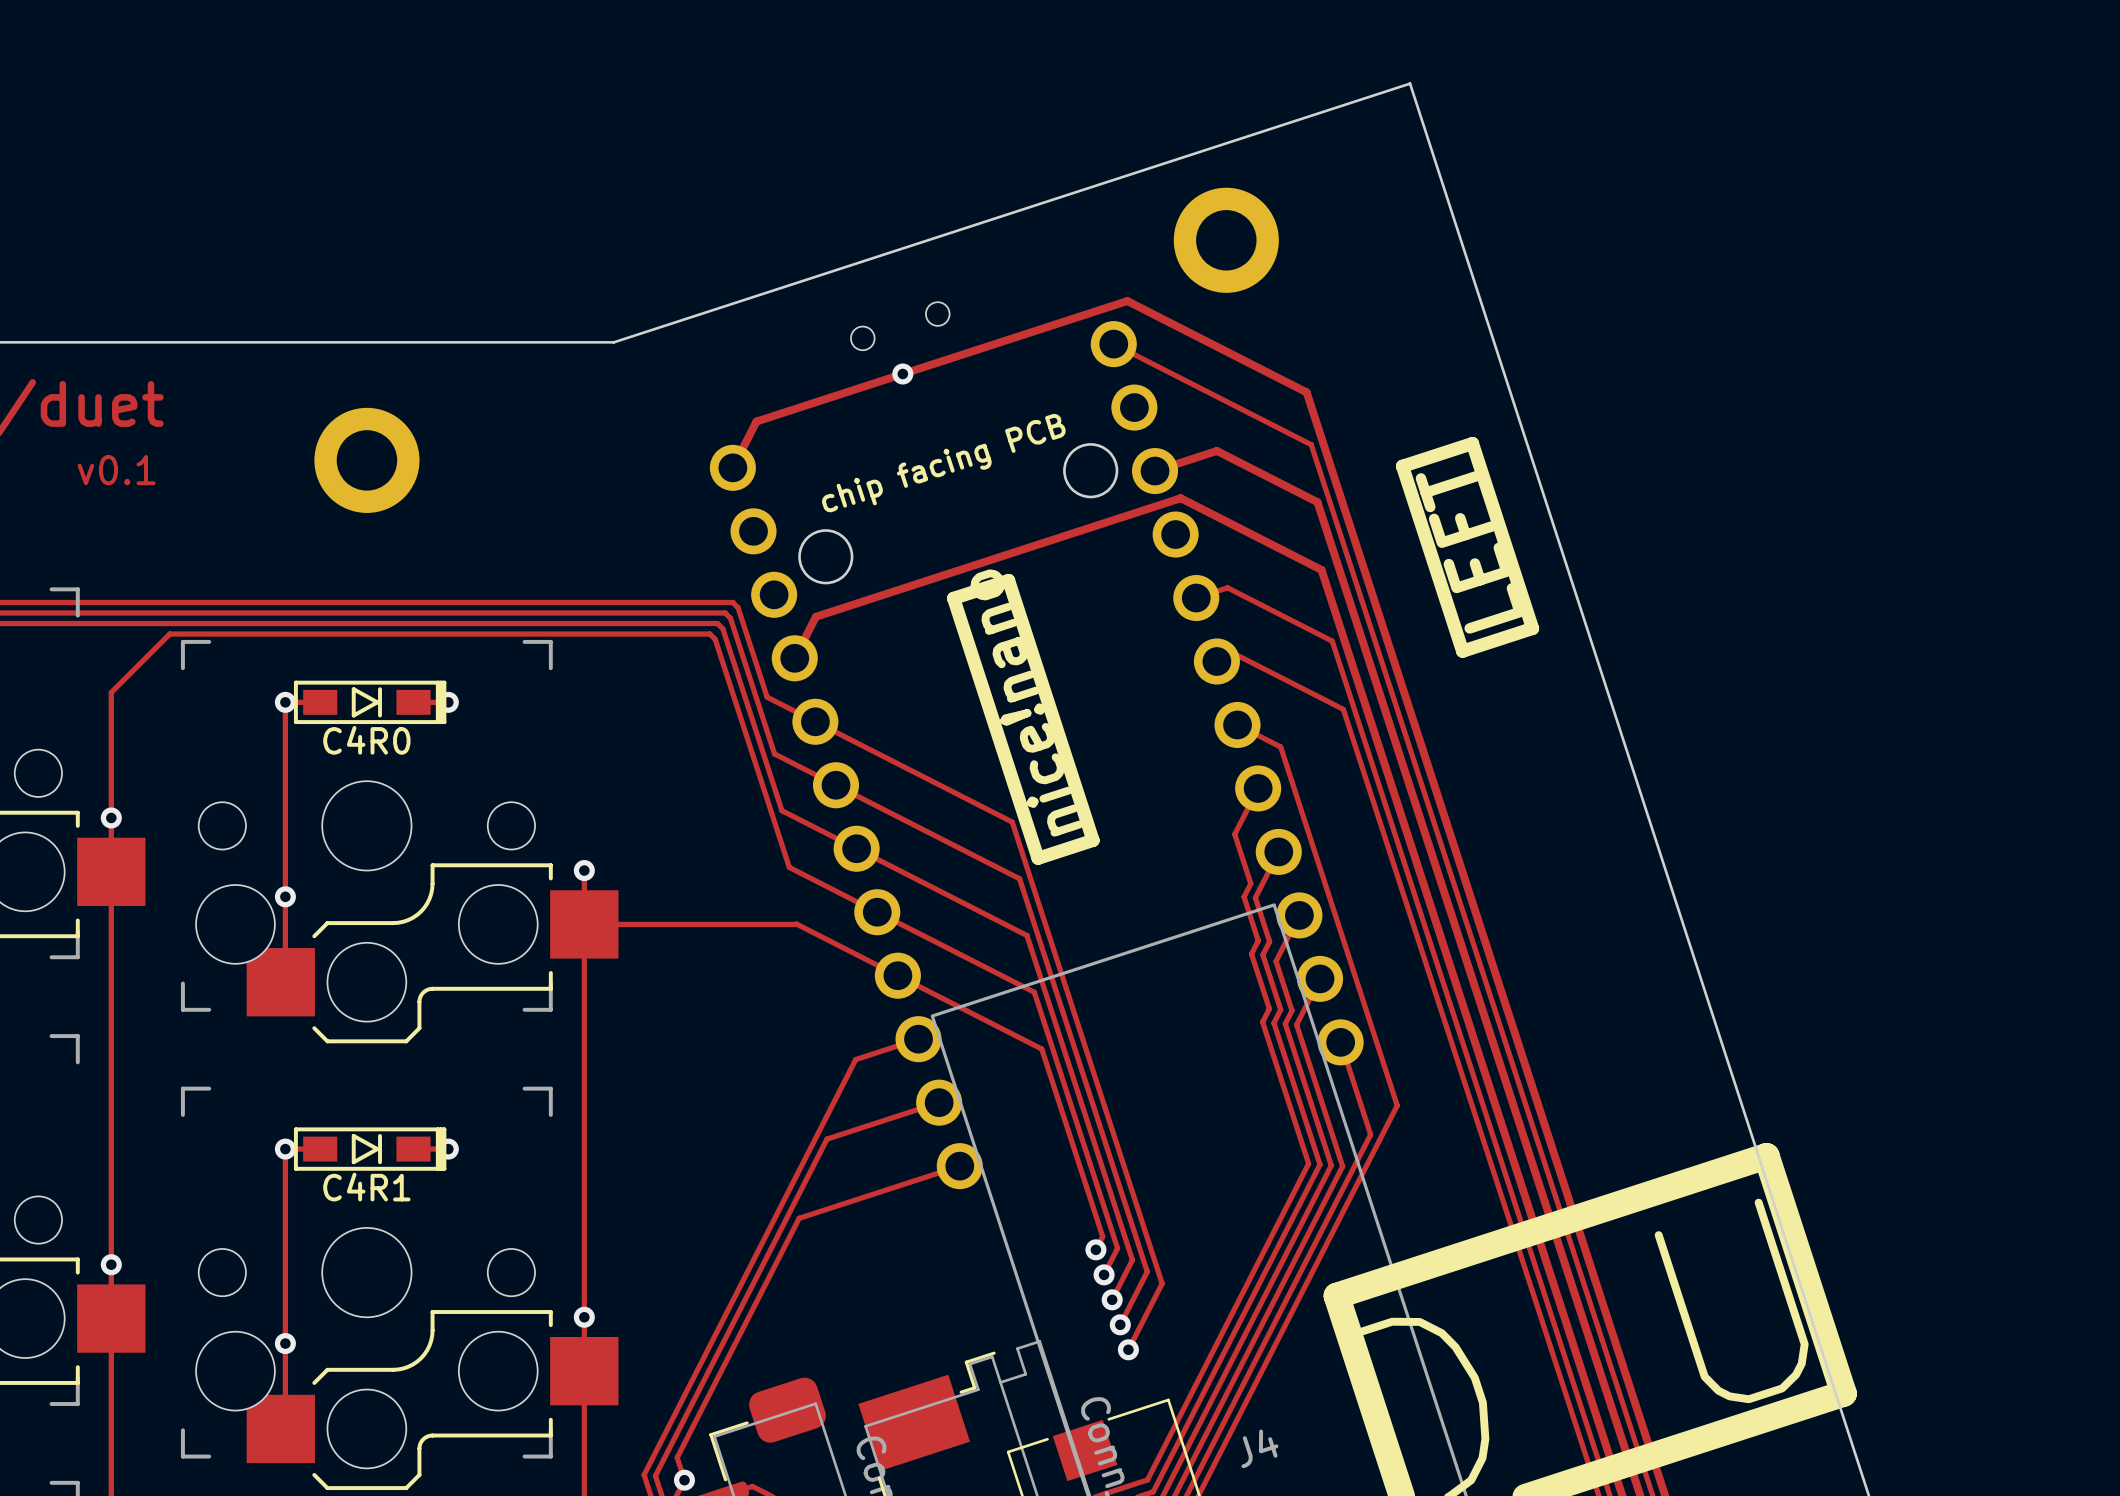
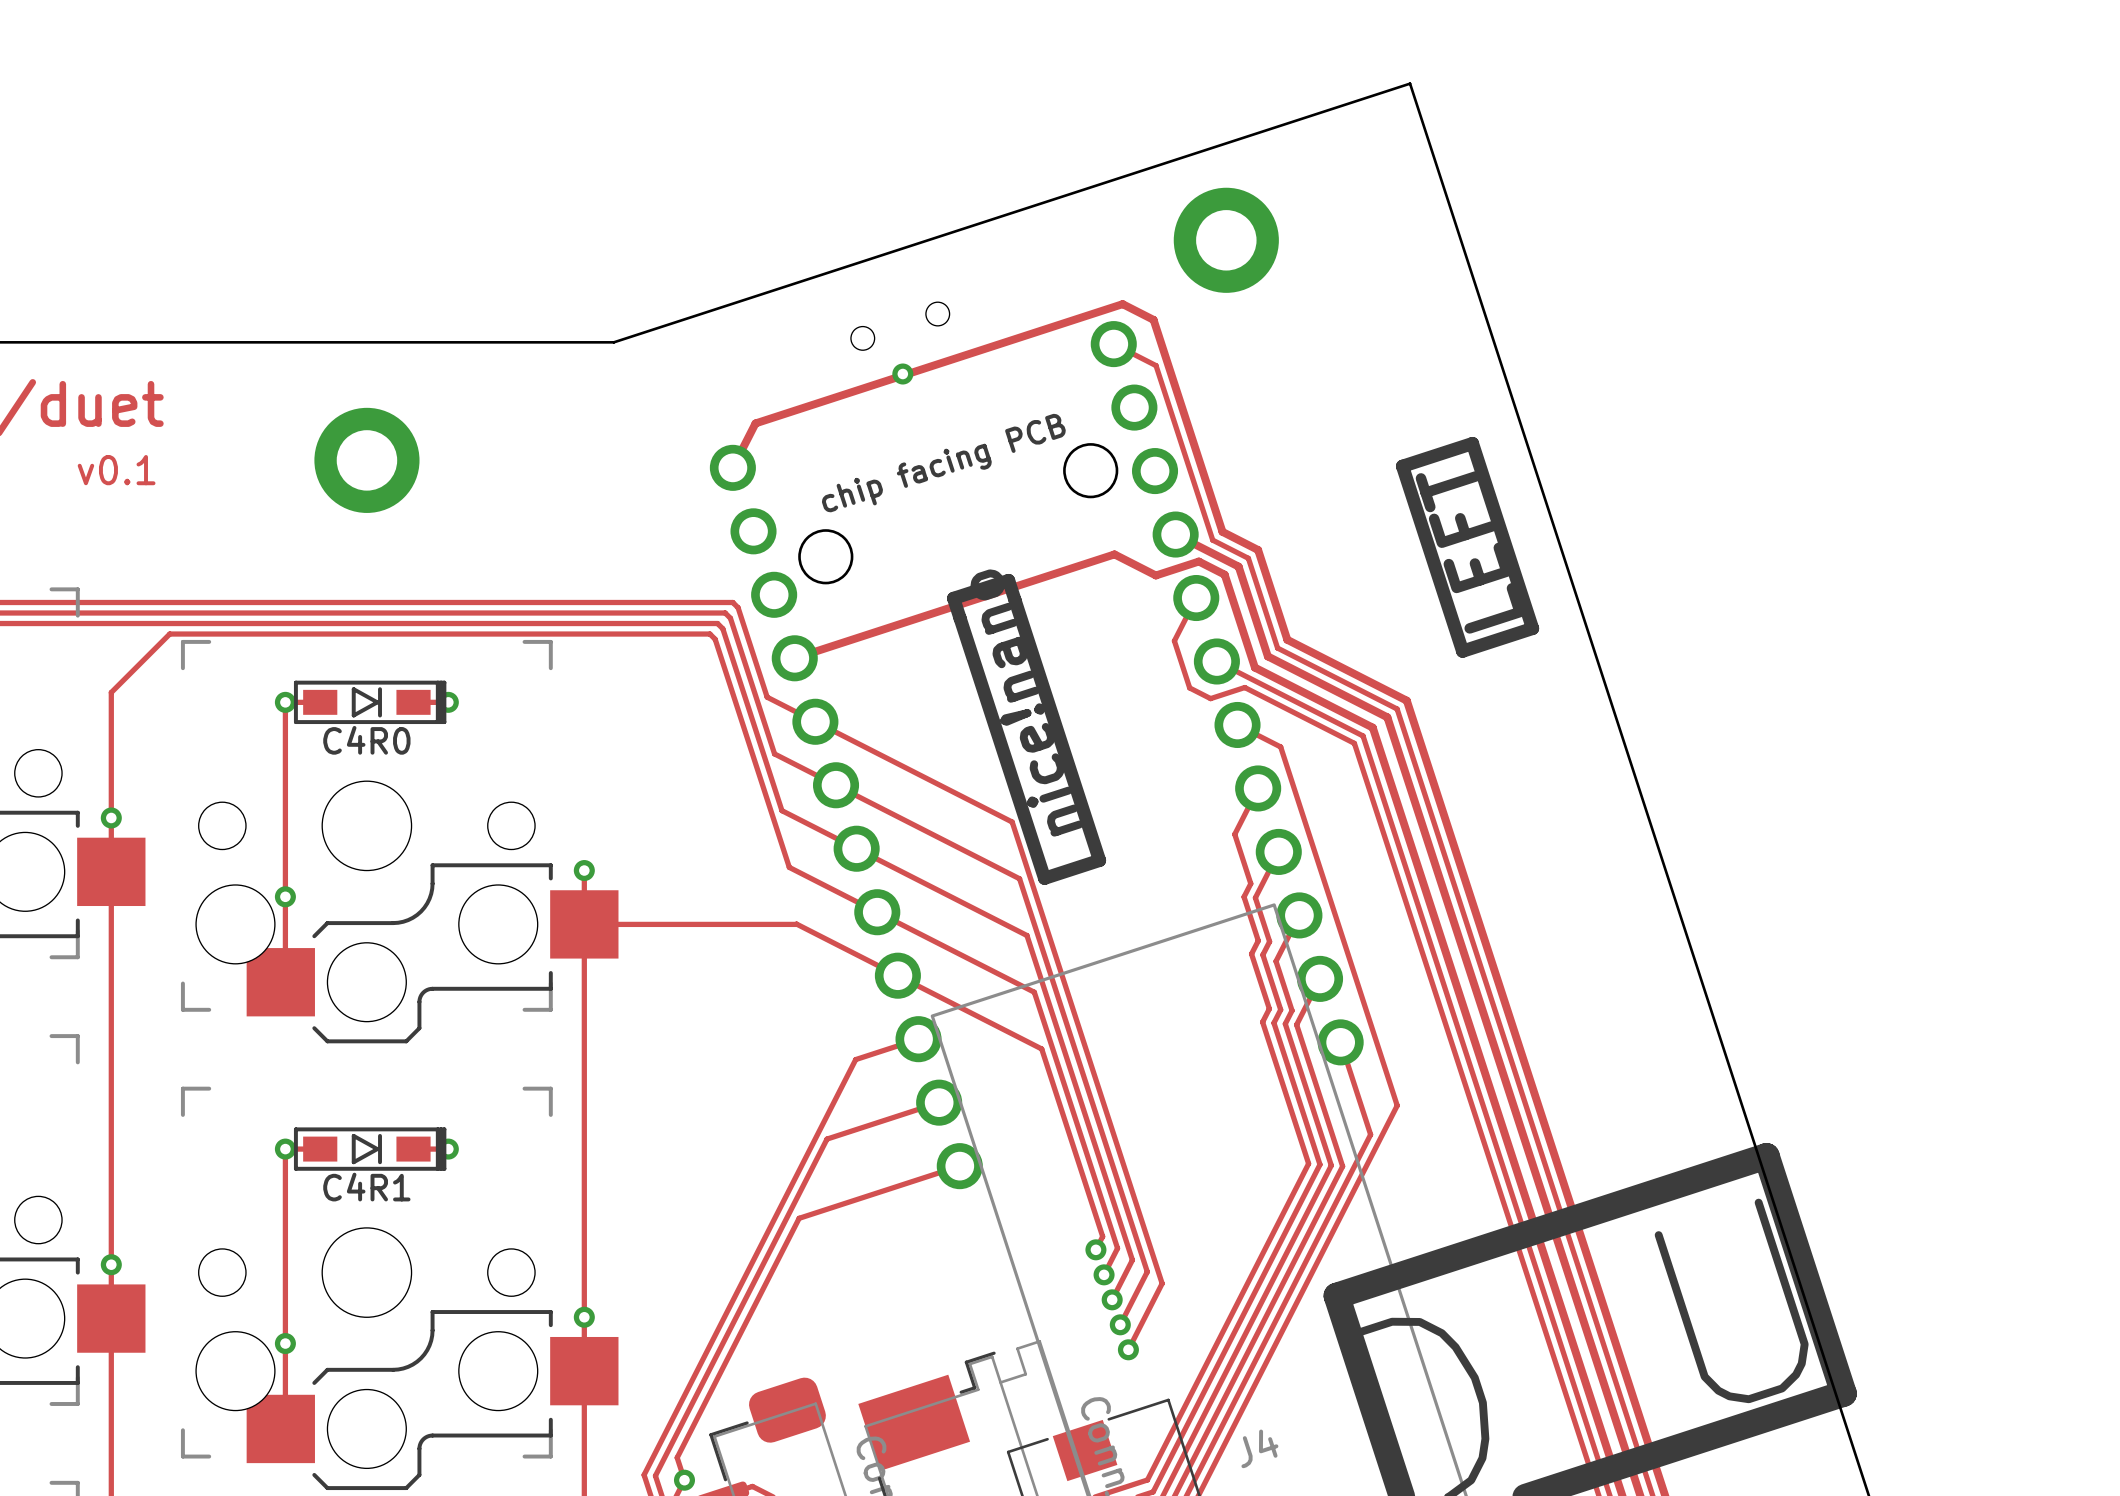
track: (1156, 365) (1311, 444) (1397, 709) -> (1156, 365) (1212, 540) (1248, 558) (1277, 648) (1397, 709)
track: (755, 423) (1127, 301) (1306, 392) (1406, 700) -> (755, 423) (1122, 304) (1153, 319) (1222, 531) (1258, 550) (1287, 639) (1406, 700)
track: (1155, 471) (1216, 450) (1317, 502) (1387, 717) -> (1175, 534) (1238, 566) (1267, 656) (1387, 717)
track: (1196, 598) (1227, 587) (1332, 641) (1363, 735) -> (1196, 598) (1174, 640) (1189, 687) (1210, 698) (1244, 687) (1354, 743)
track: (794, 658) (815, 616) (1180, 498) (1321, 569) (1372, 727) -> (794, 658) (1114, 554) (1155, 575) (1198, 561) (1224, 574) (1254, 667) (1372, 727)
track: (1216, 661) (1236, 655) (1343, 709) (1354, 743) -> (1216, 661) (1363, 735)
line: (1093, 840) (1038, 858) -> (1093, 840) (1099, 860) (1044, 878) (1038, 858)

